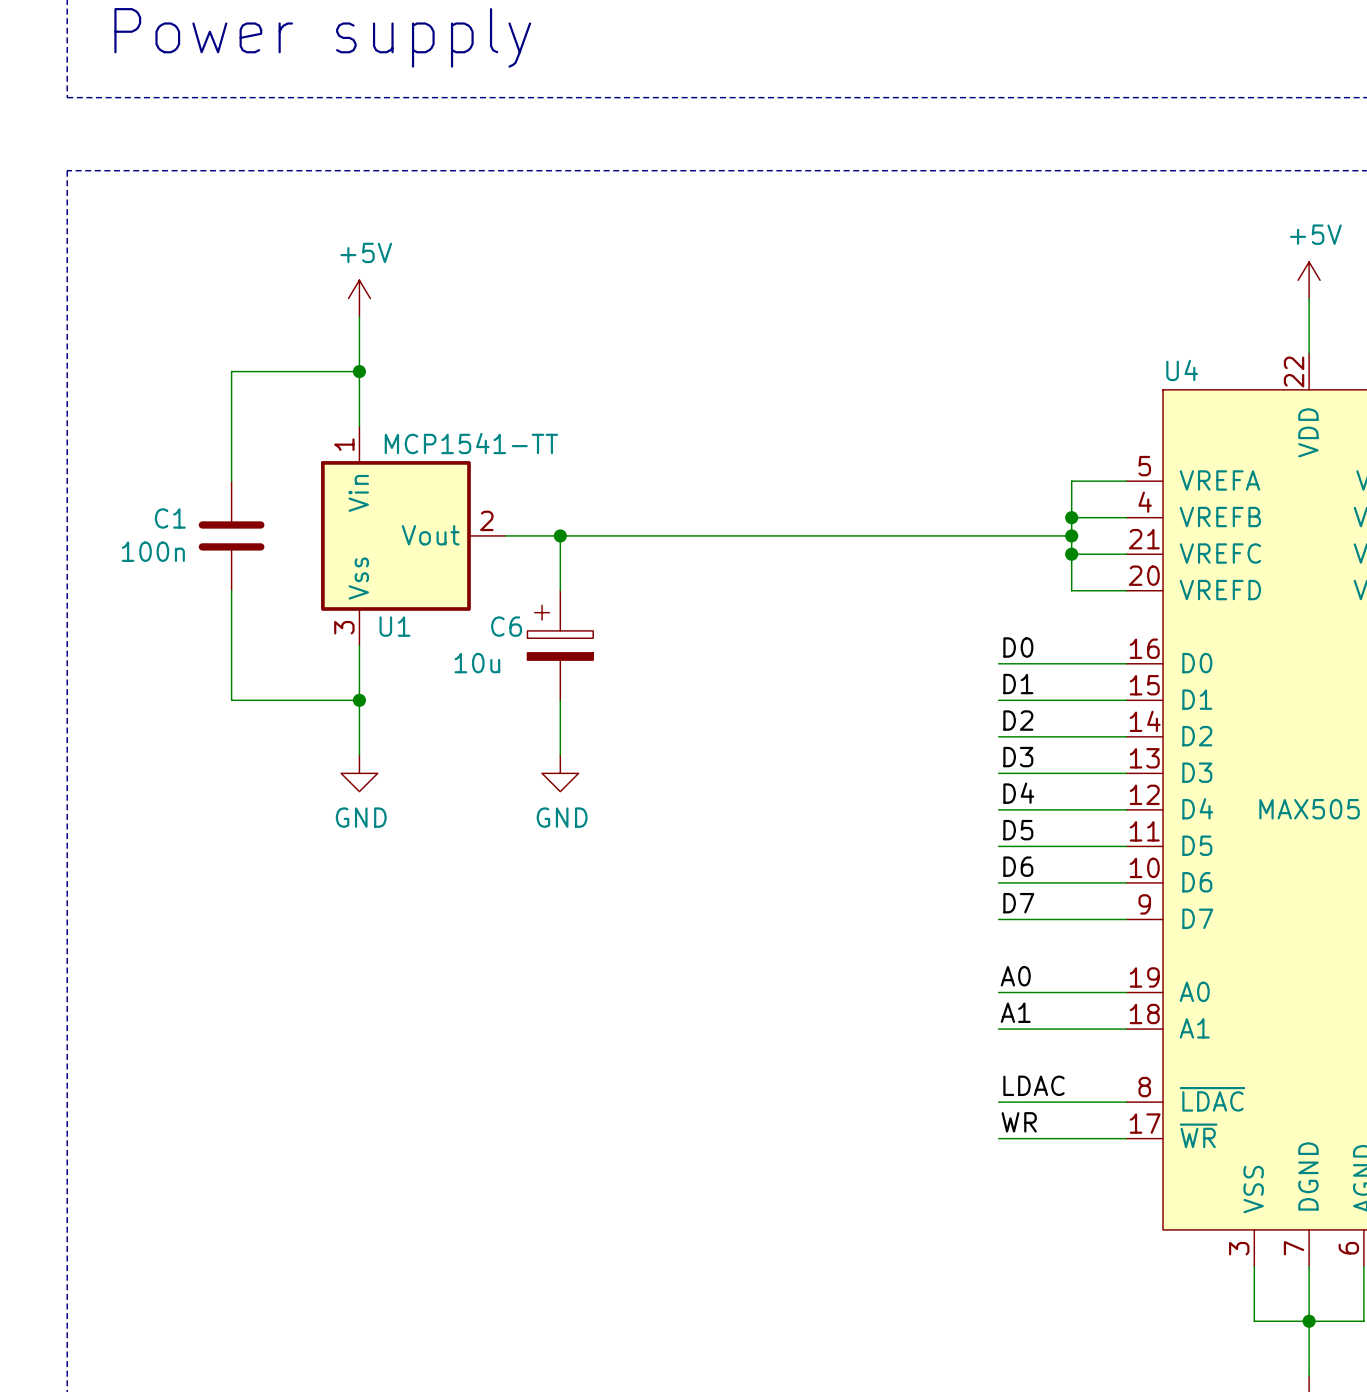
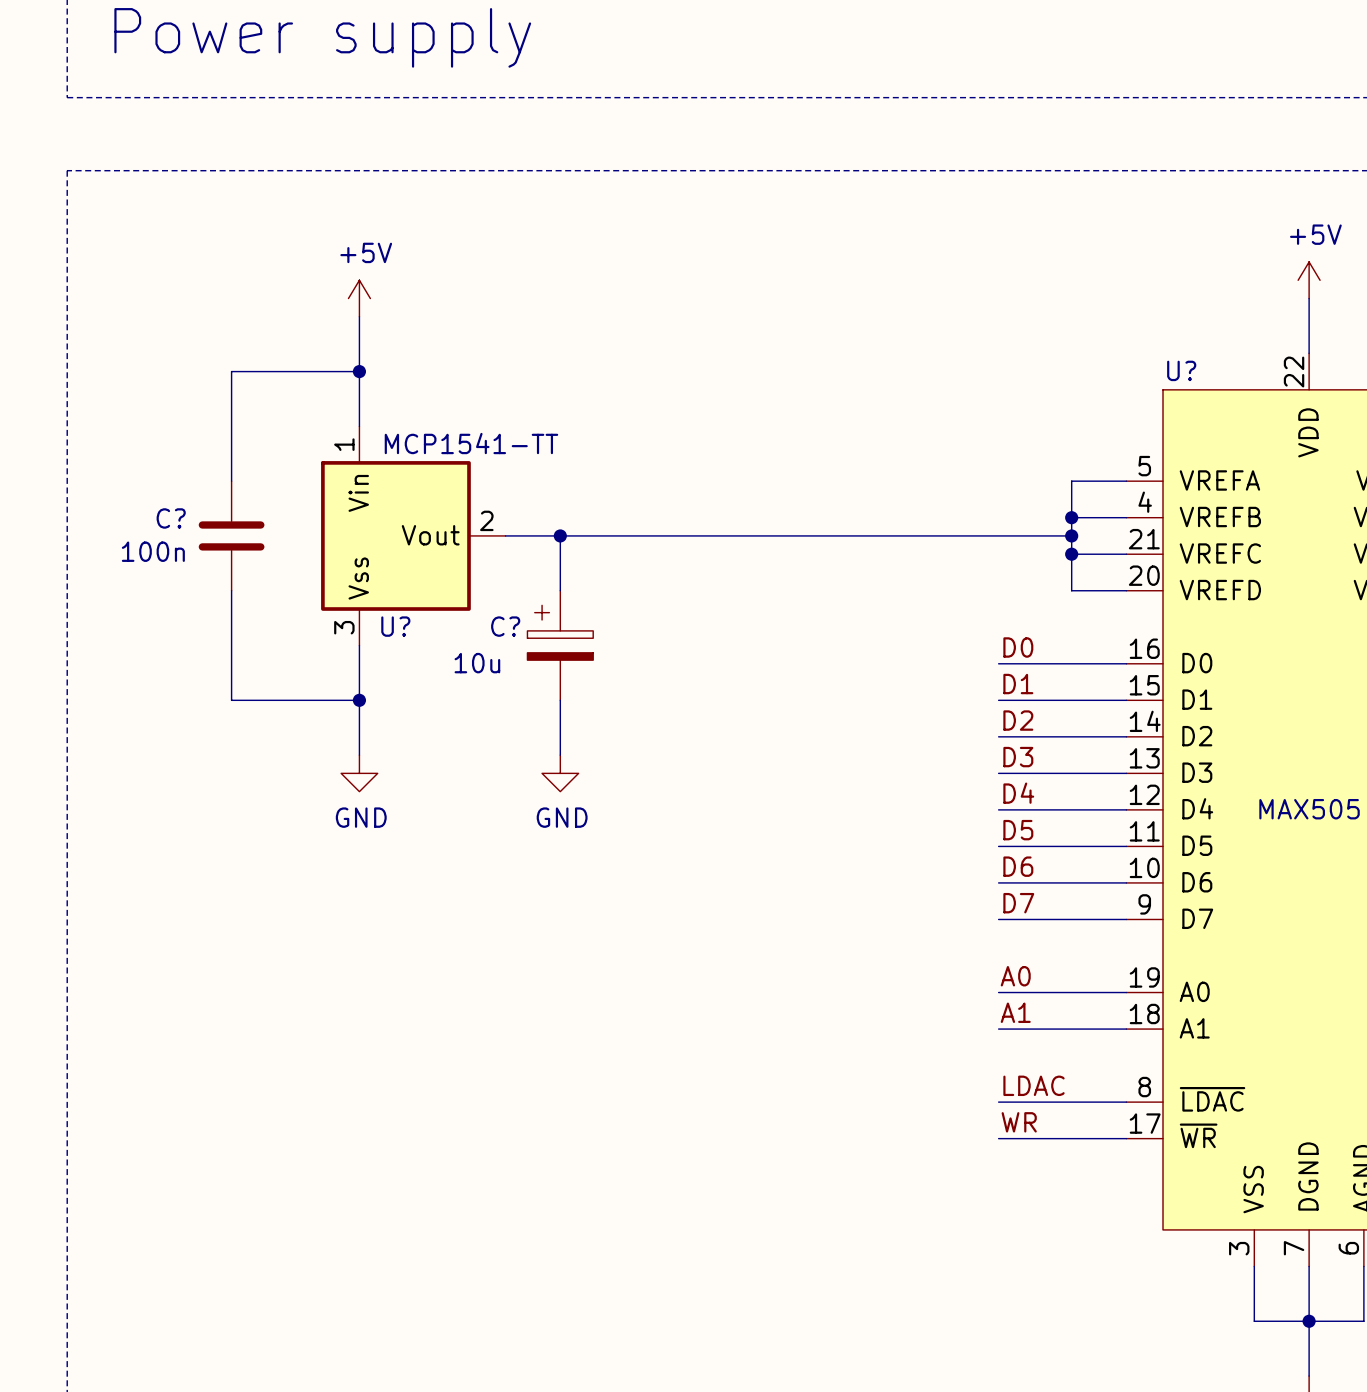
U4 name: U4 (1182, 370) -> U? (1181, 370)
C1 name: C1 (170, 518) -> C? (171, 518)
U1 name: U1 (394, 626) -> U? (395, 626)
C6 name: C6 (506, 626) -> C? (505, 626)

